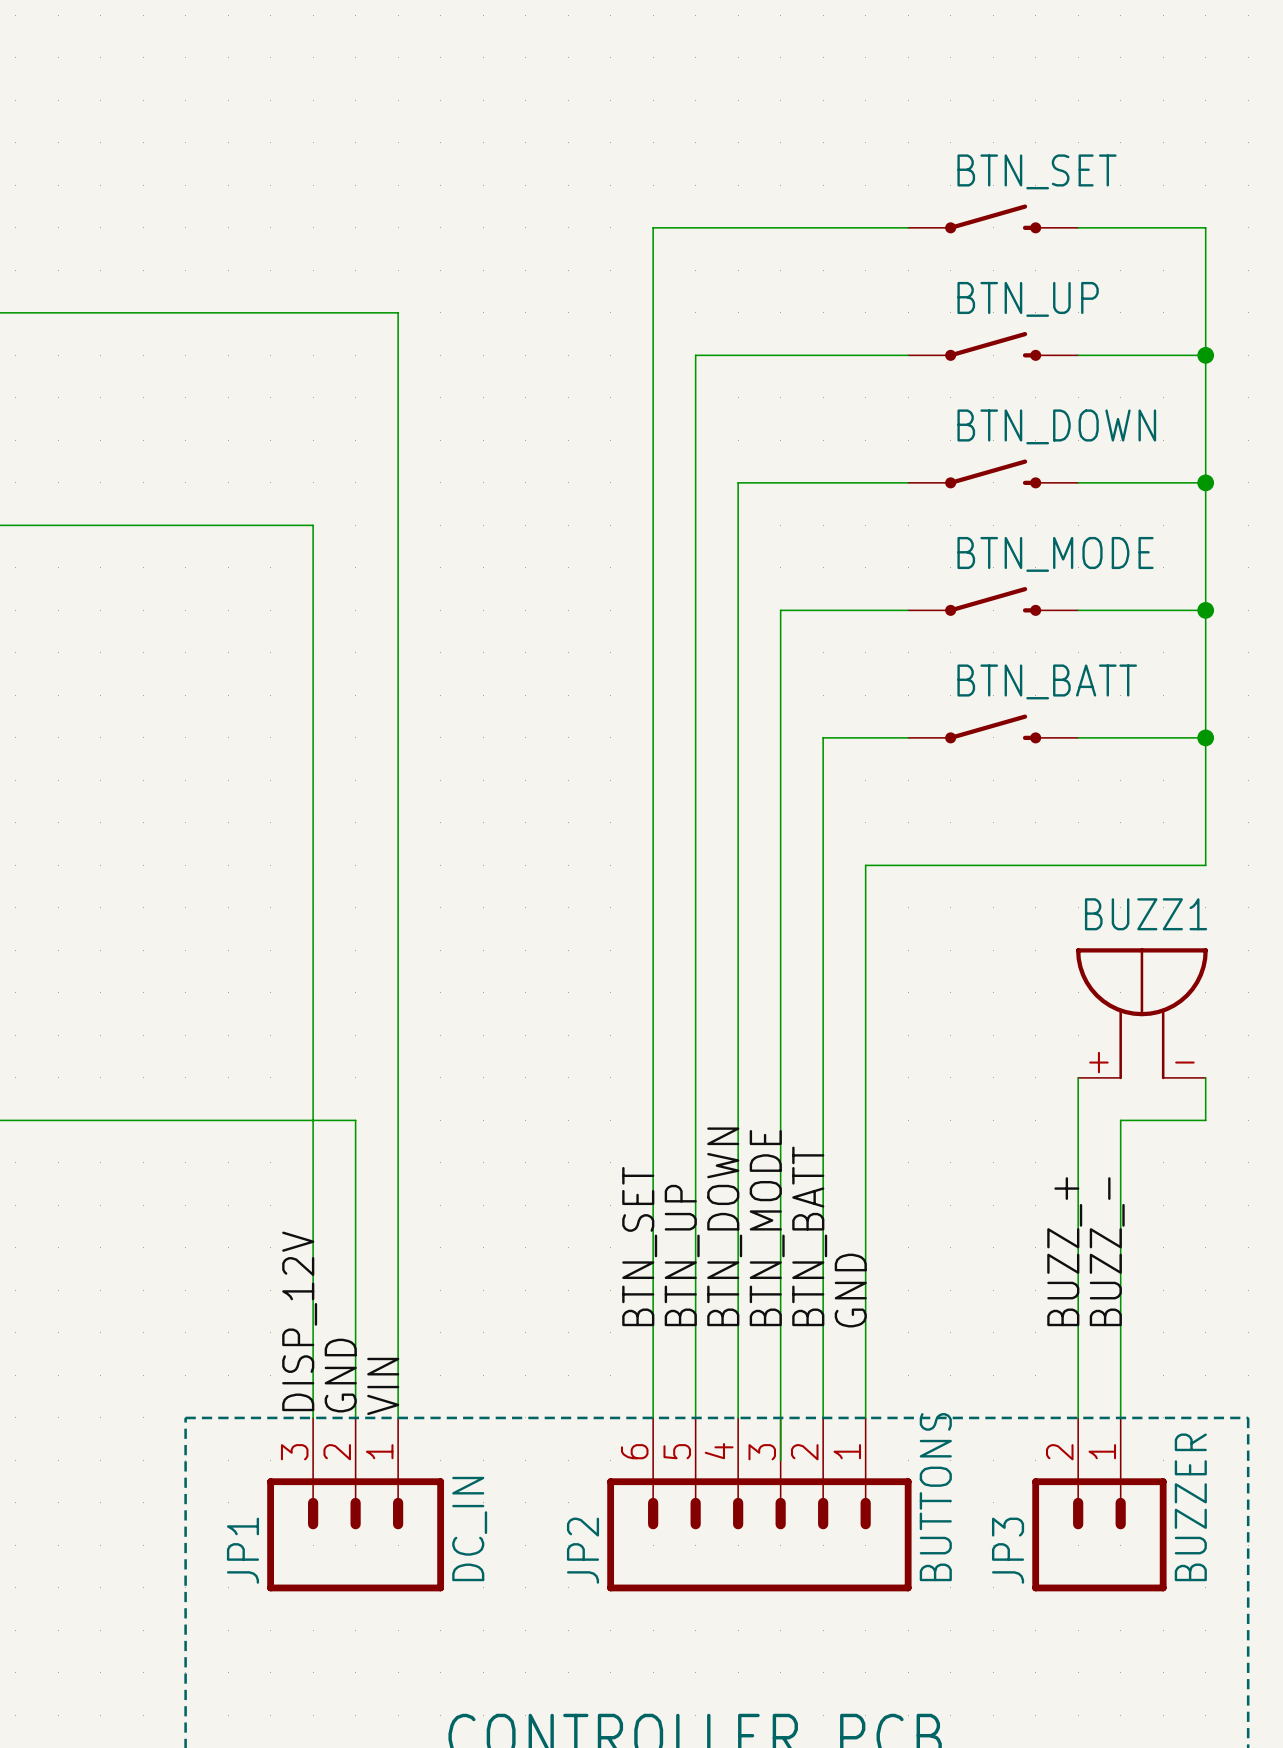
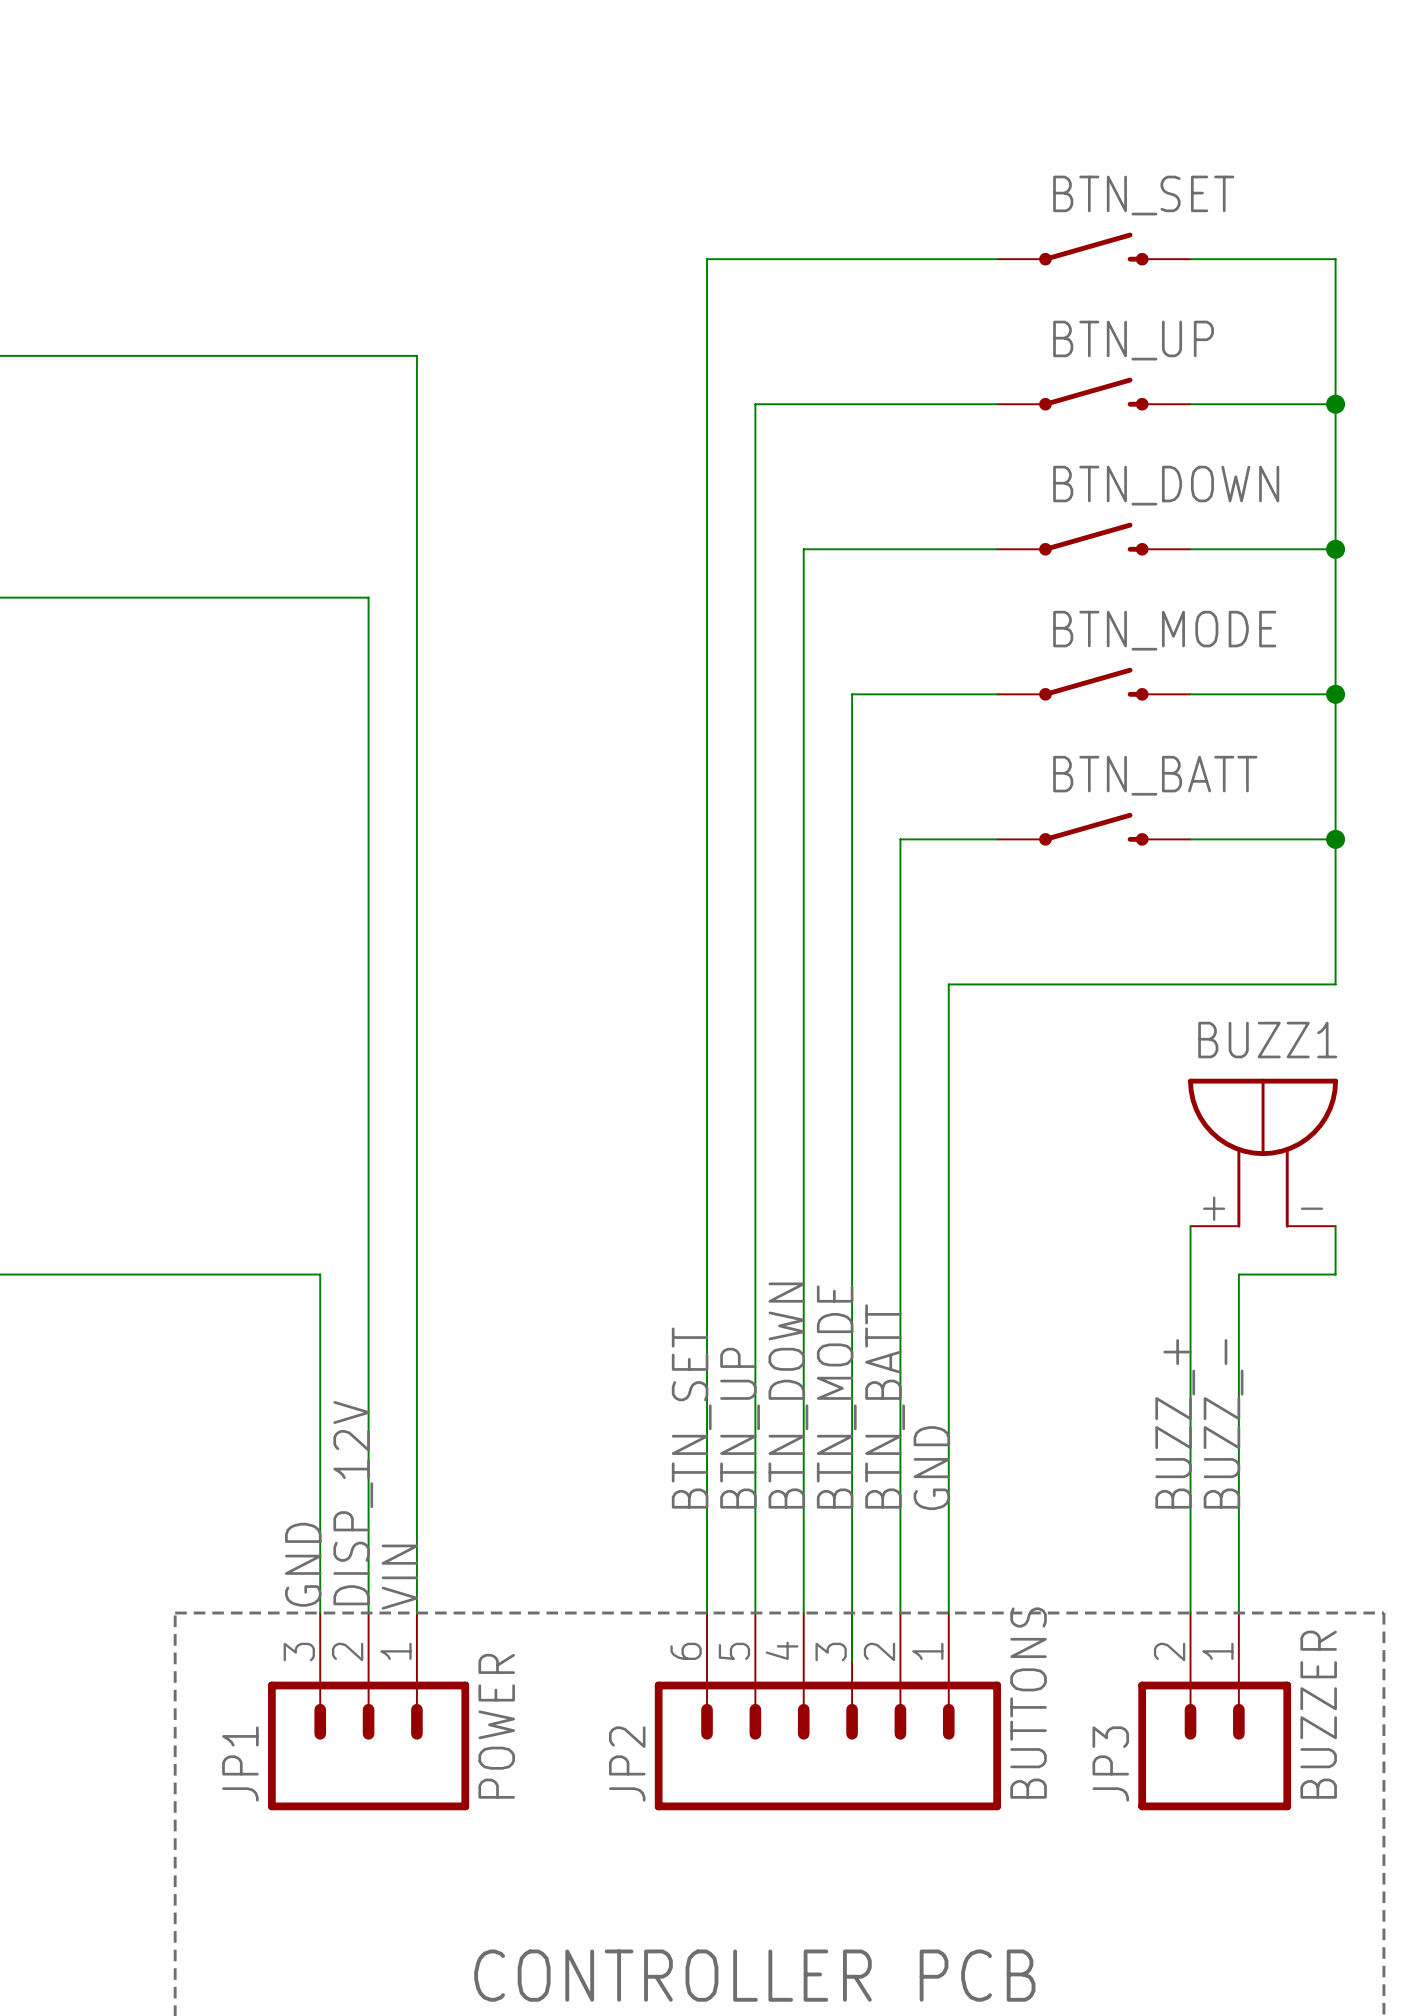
wire: (313, 525) (313, 1120) (355, 1120) -> (320, 597) (368, 597) (368, 1274)
label: DISP_12V (299, 1321) -> GND (303, 1564)
label: GND (340, 1375) -> DISP_12V (353, 1503)
JP1 value: DC_IN (469, 1529) -> POWER (496, 1726)

